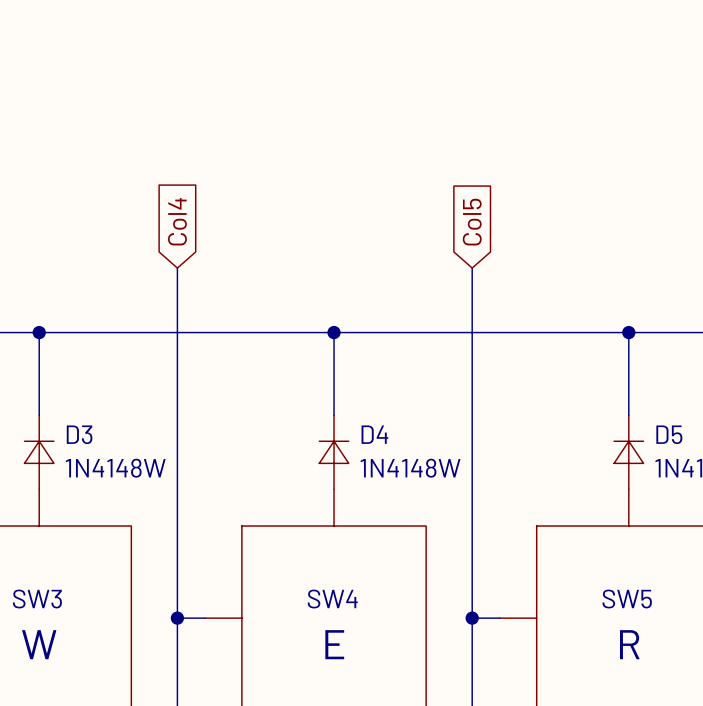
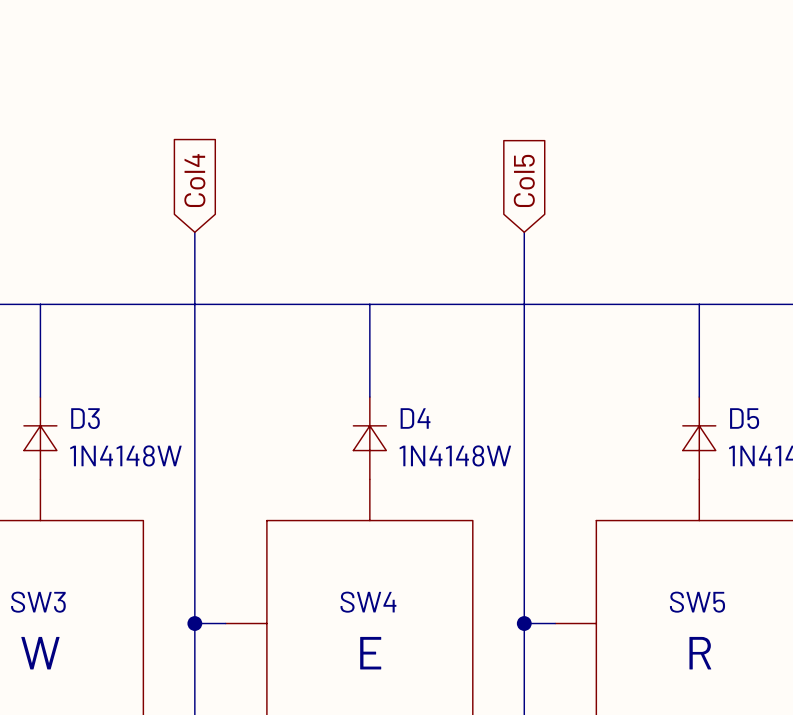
junction: (39, 332) -> none
junction: (334, 332) -> none
junction: (628, 332) -> none

